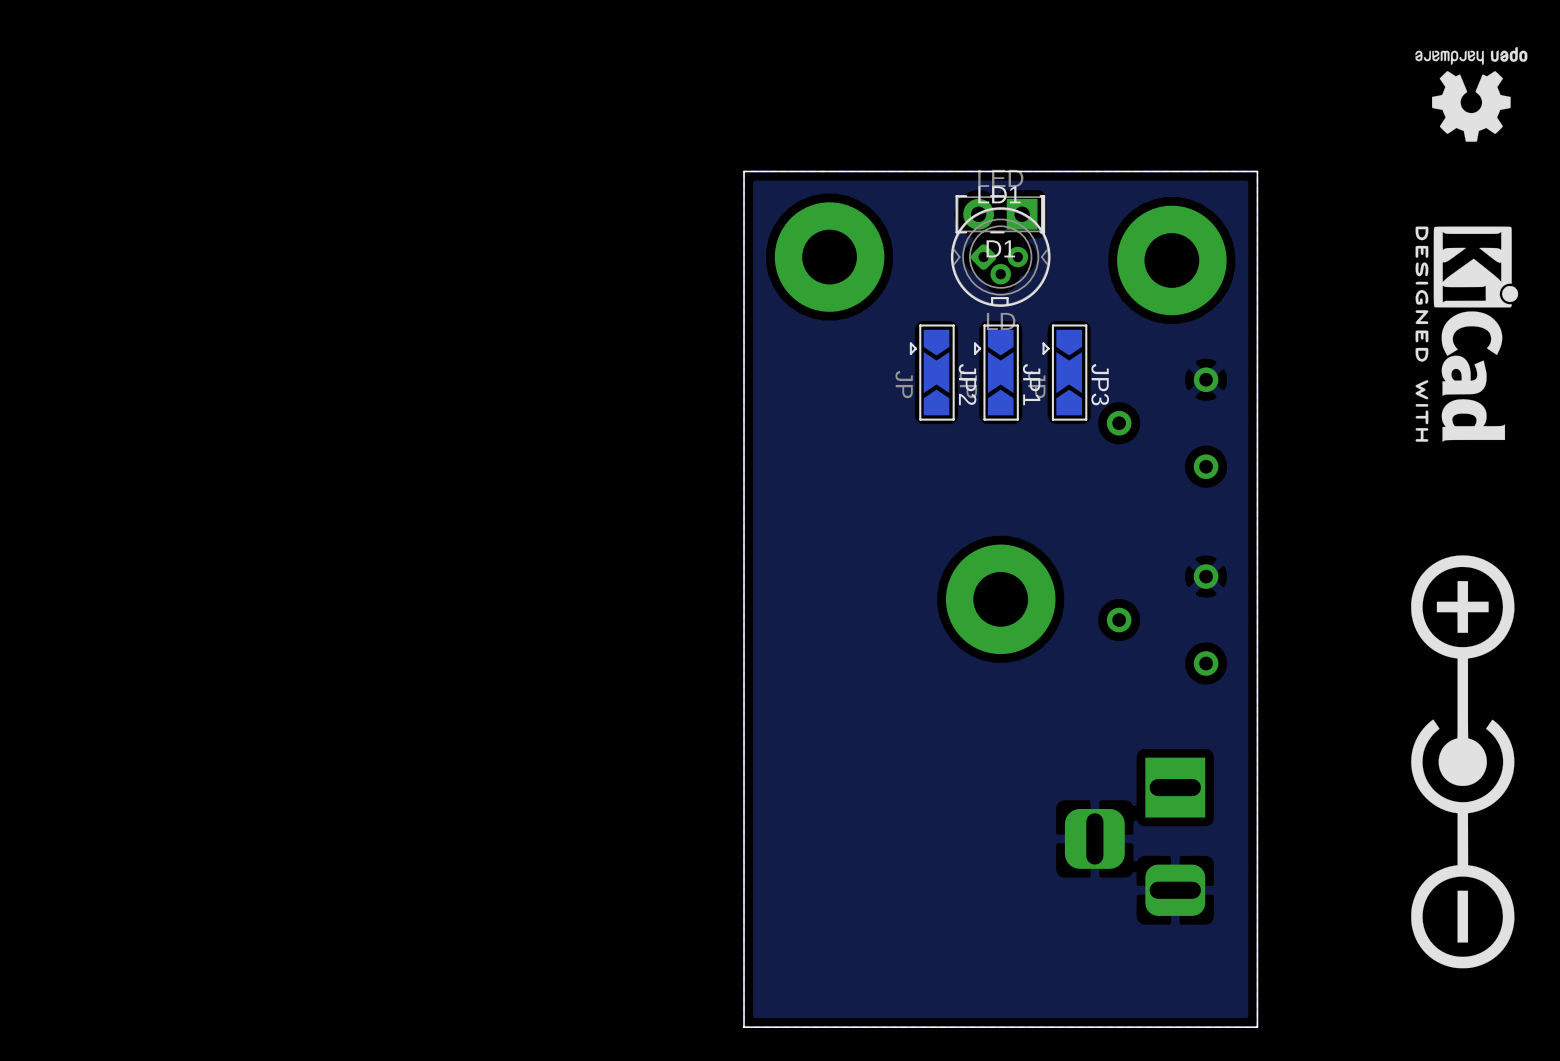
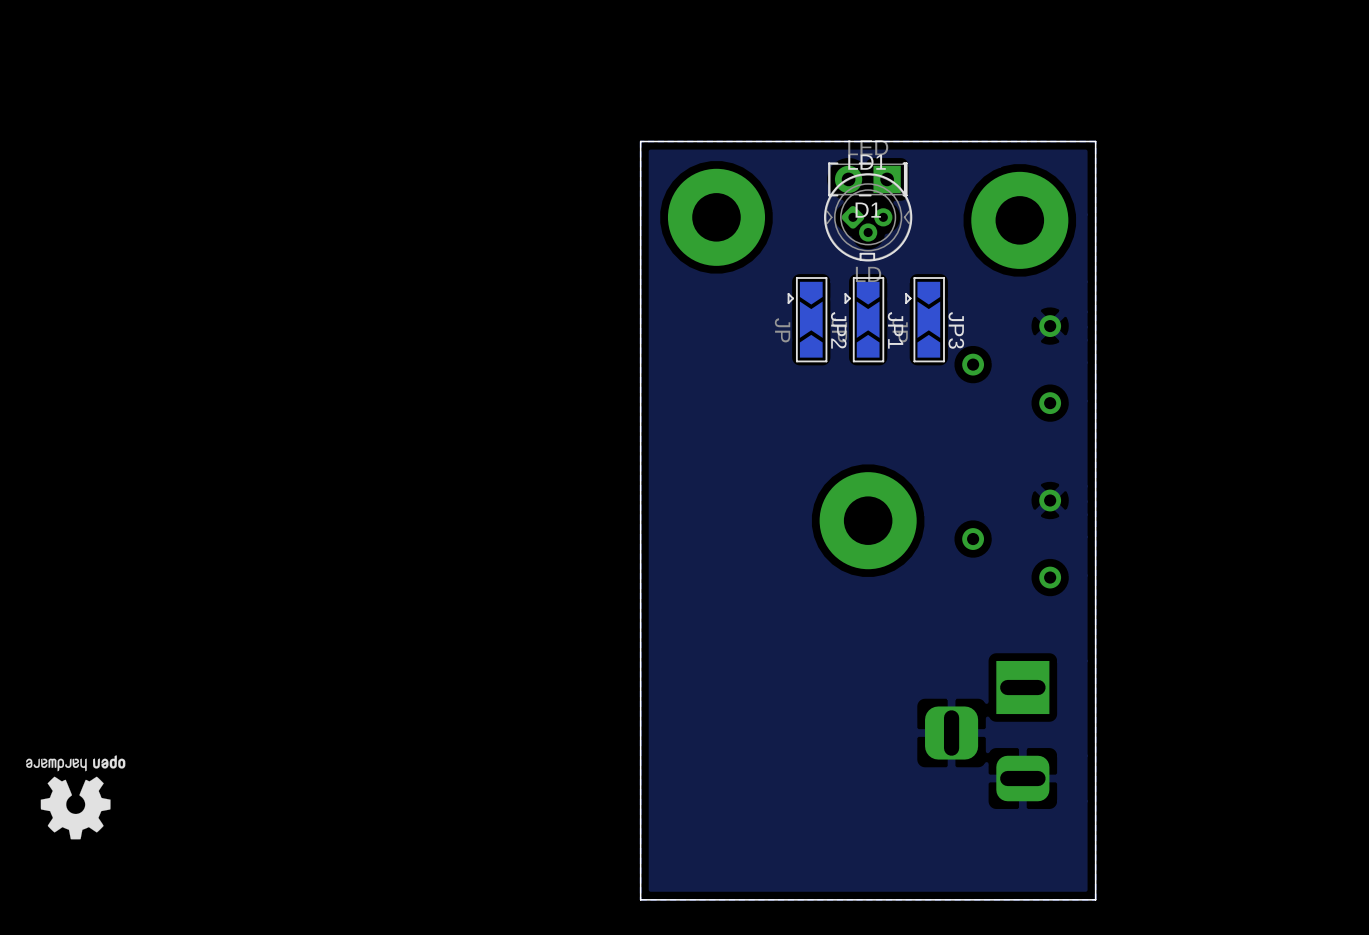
drawing: [1415, 46, 1528, 142] -> none
drawing: [1415, 226, 1519, 442] -> none
drawing: [1411, 555, 1515, 969] -> none
drawing: none -> [26, 755, 126, 840]

